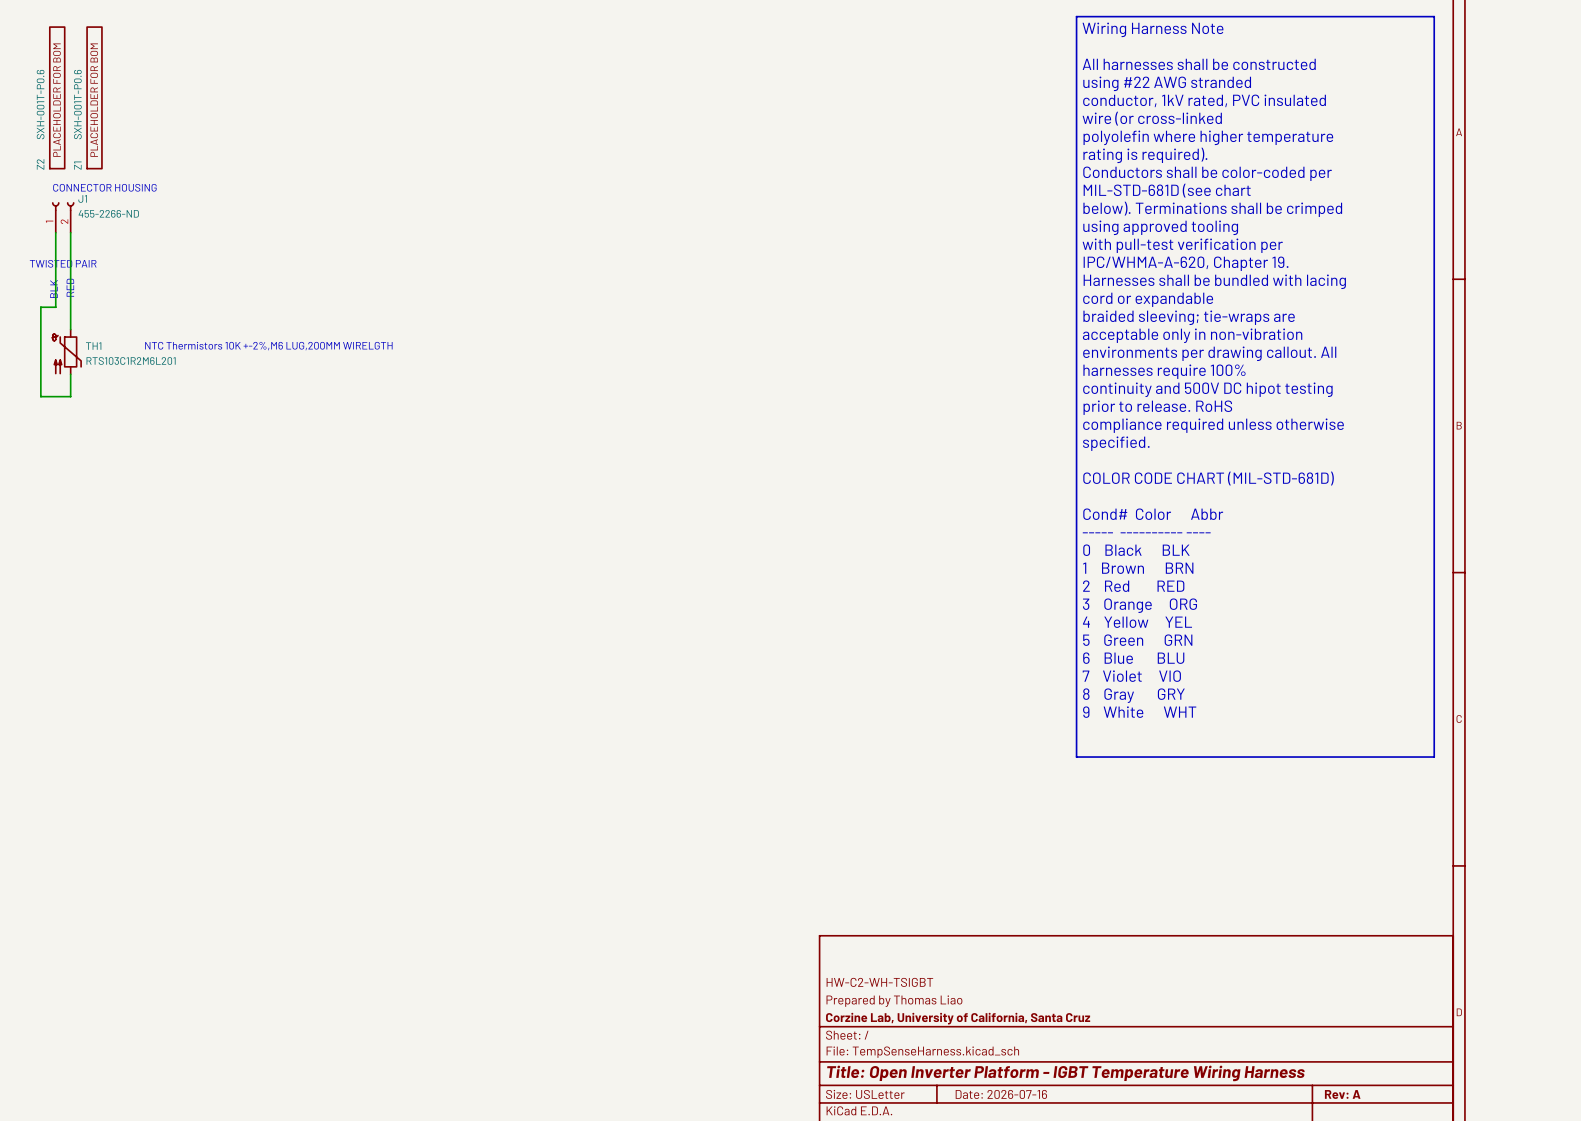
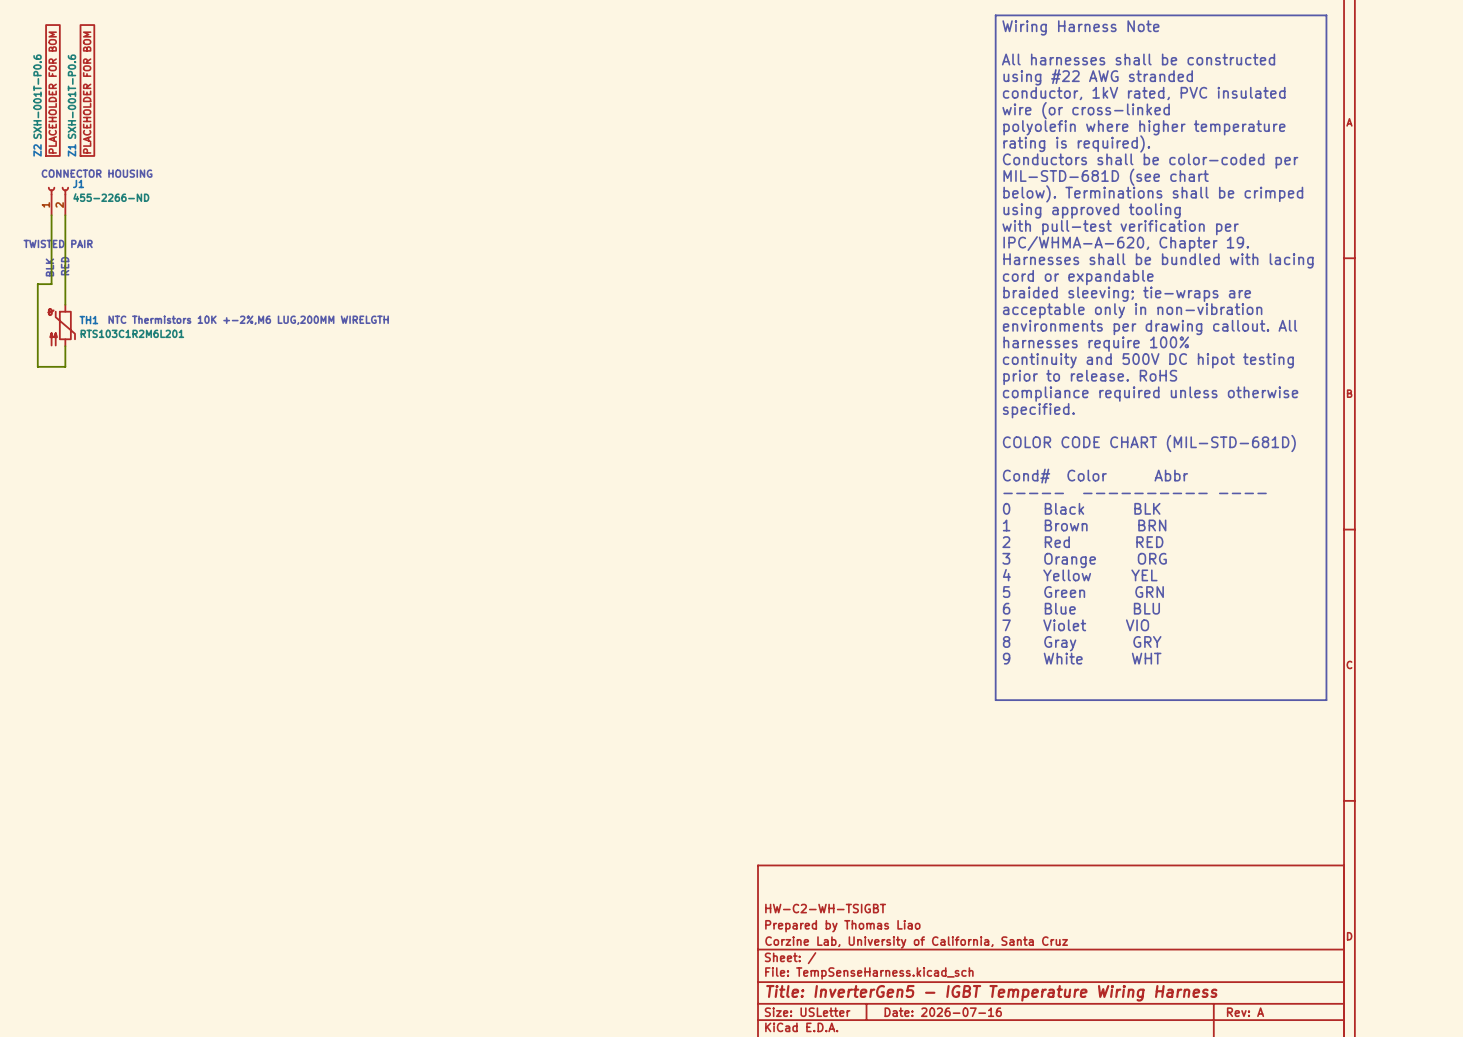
title block: Title: Open Inverter Platform - IGBT Temperature Wiring Harness (1065, 1073) -> Title: InverterGen5 - IGBT Temperature Wiring Harness (991, 993)

